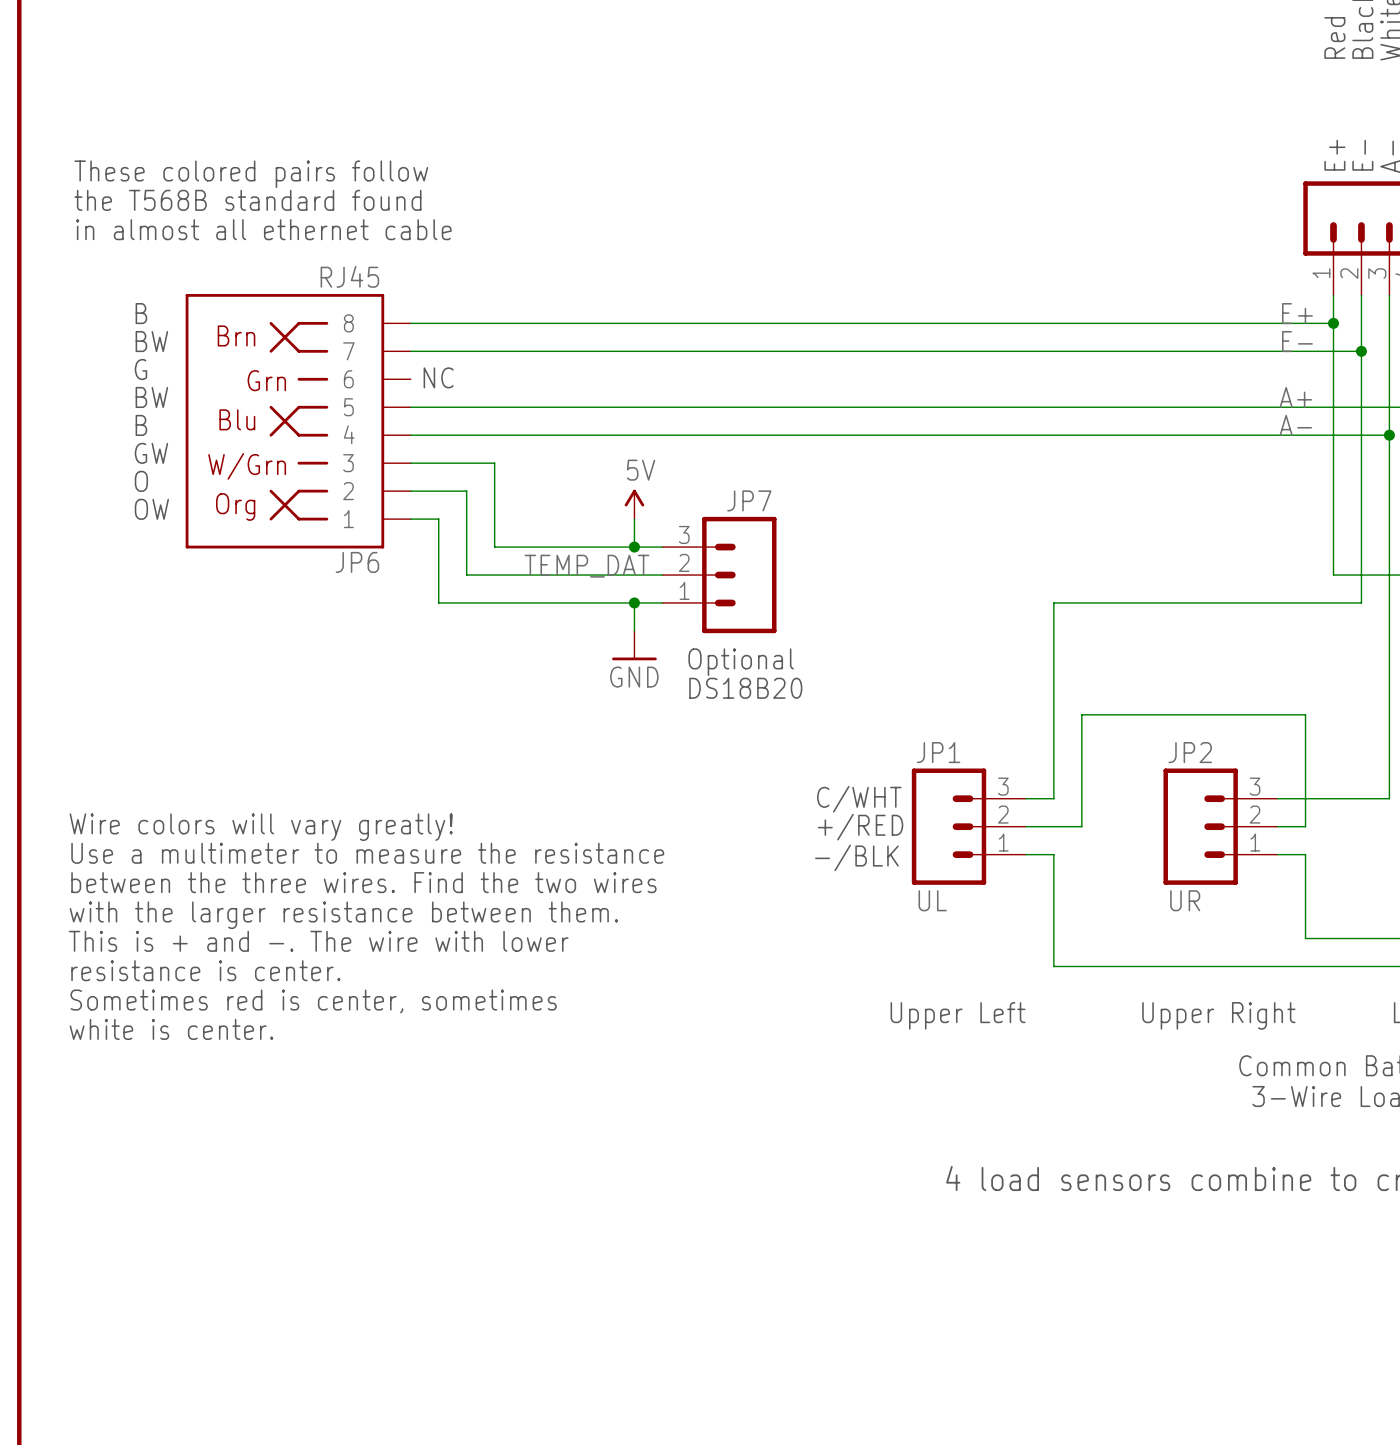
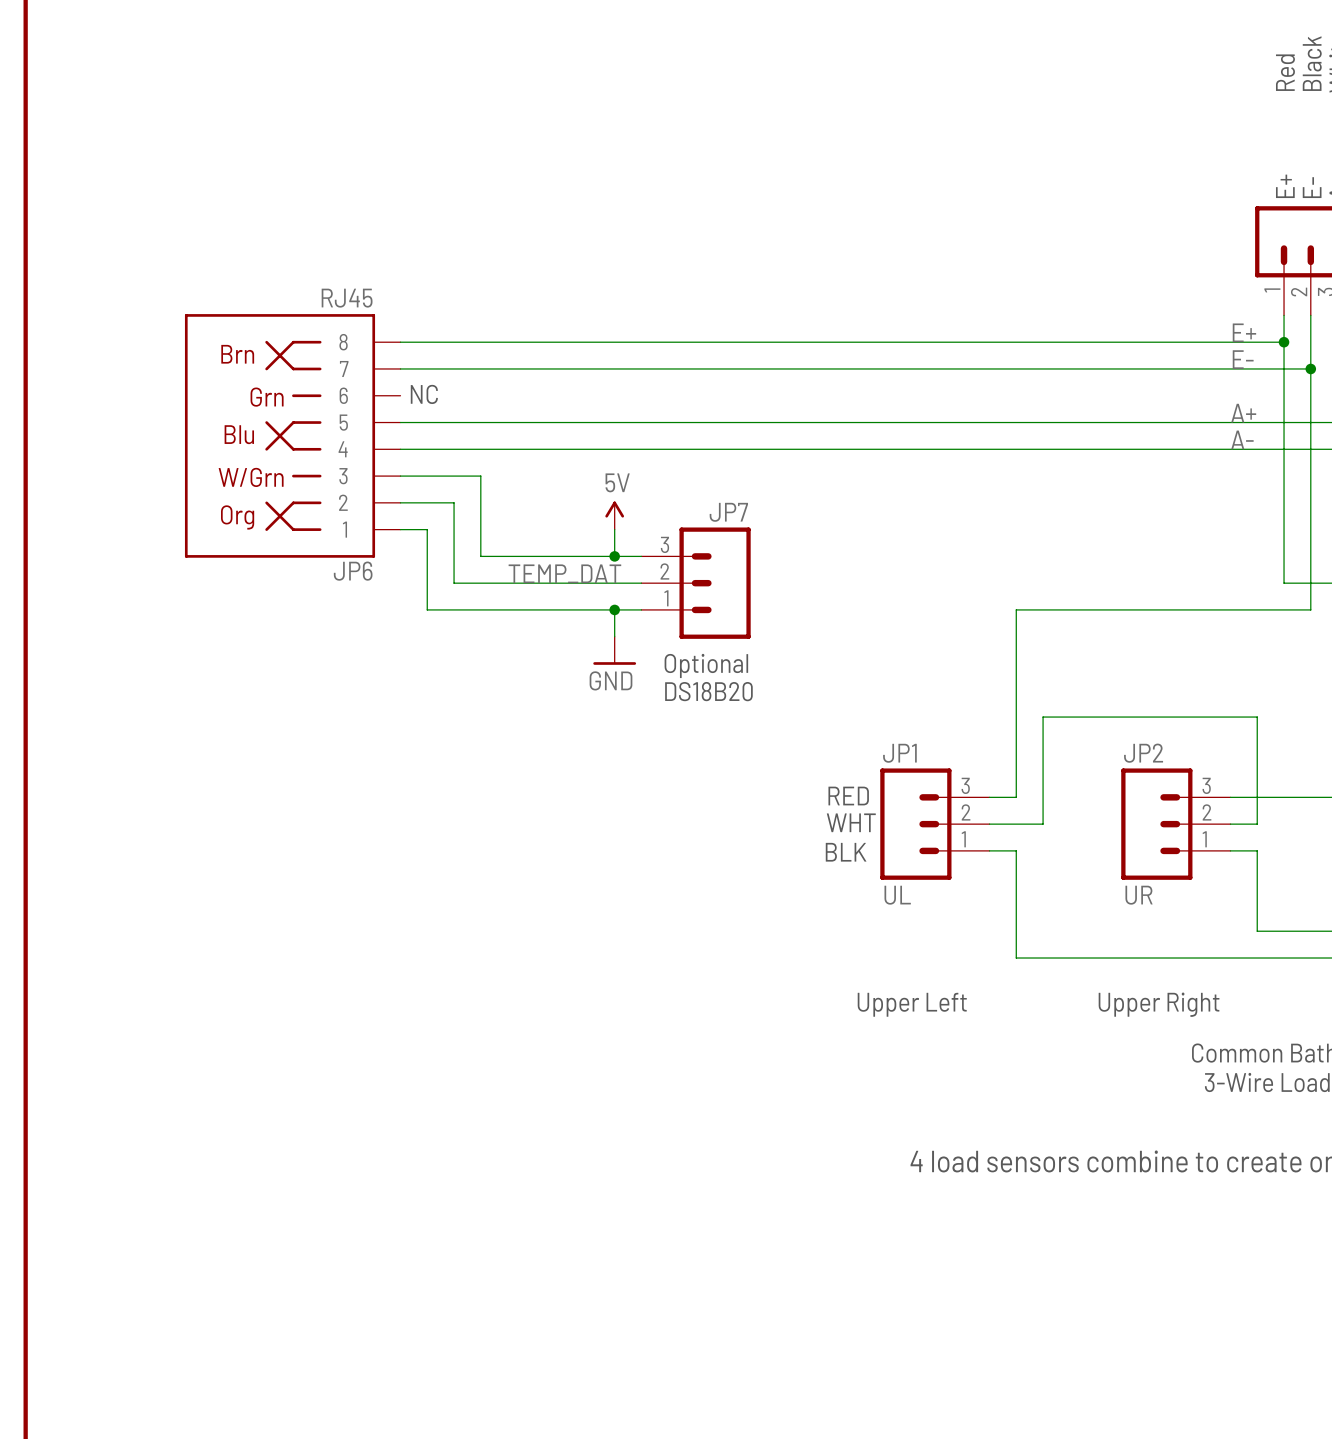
text: These colored pairs follow (251, 174) -> none
text: the T568B standard found (247, 200) -> none
text: in almost all ethernet cable (263, 229) -> none
text: B (141, 313) -> none
text: BW (151, 341) -> none
text: G (140, 369) -> none
text: BW (151, 397) -> none
text: B (141, 425) -> none
text: GW (151, 453) -> none
text: O (141, 481) -> none
text: OW (151, 509) -> none
text: C/WHT (859, 799) -> WHT (851, 822)
text: Wire colors will vary greatly! (261, 827) -> none
text: +/RED (860, 827) -> RED (848, 796)
text: Use a multimeter to measure the resistance (367, 853) -> none
text: -/BLK (856, 857) -> BLK (846, 852)
text: between the three wires. Find the two wires (363, 882) -> none
text: with the larger resistance between them. (343, 915) -> none
text: This is + and -. The wire with lower (318, 941) -> none
text: resistance is center. (205, 970) -> none
text: Sometimes red is center, sometimes (313, 1001) -> none
text: white is center. (171, 1029) -> none

